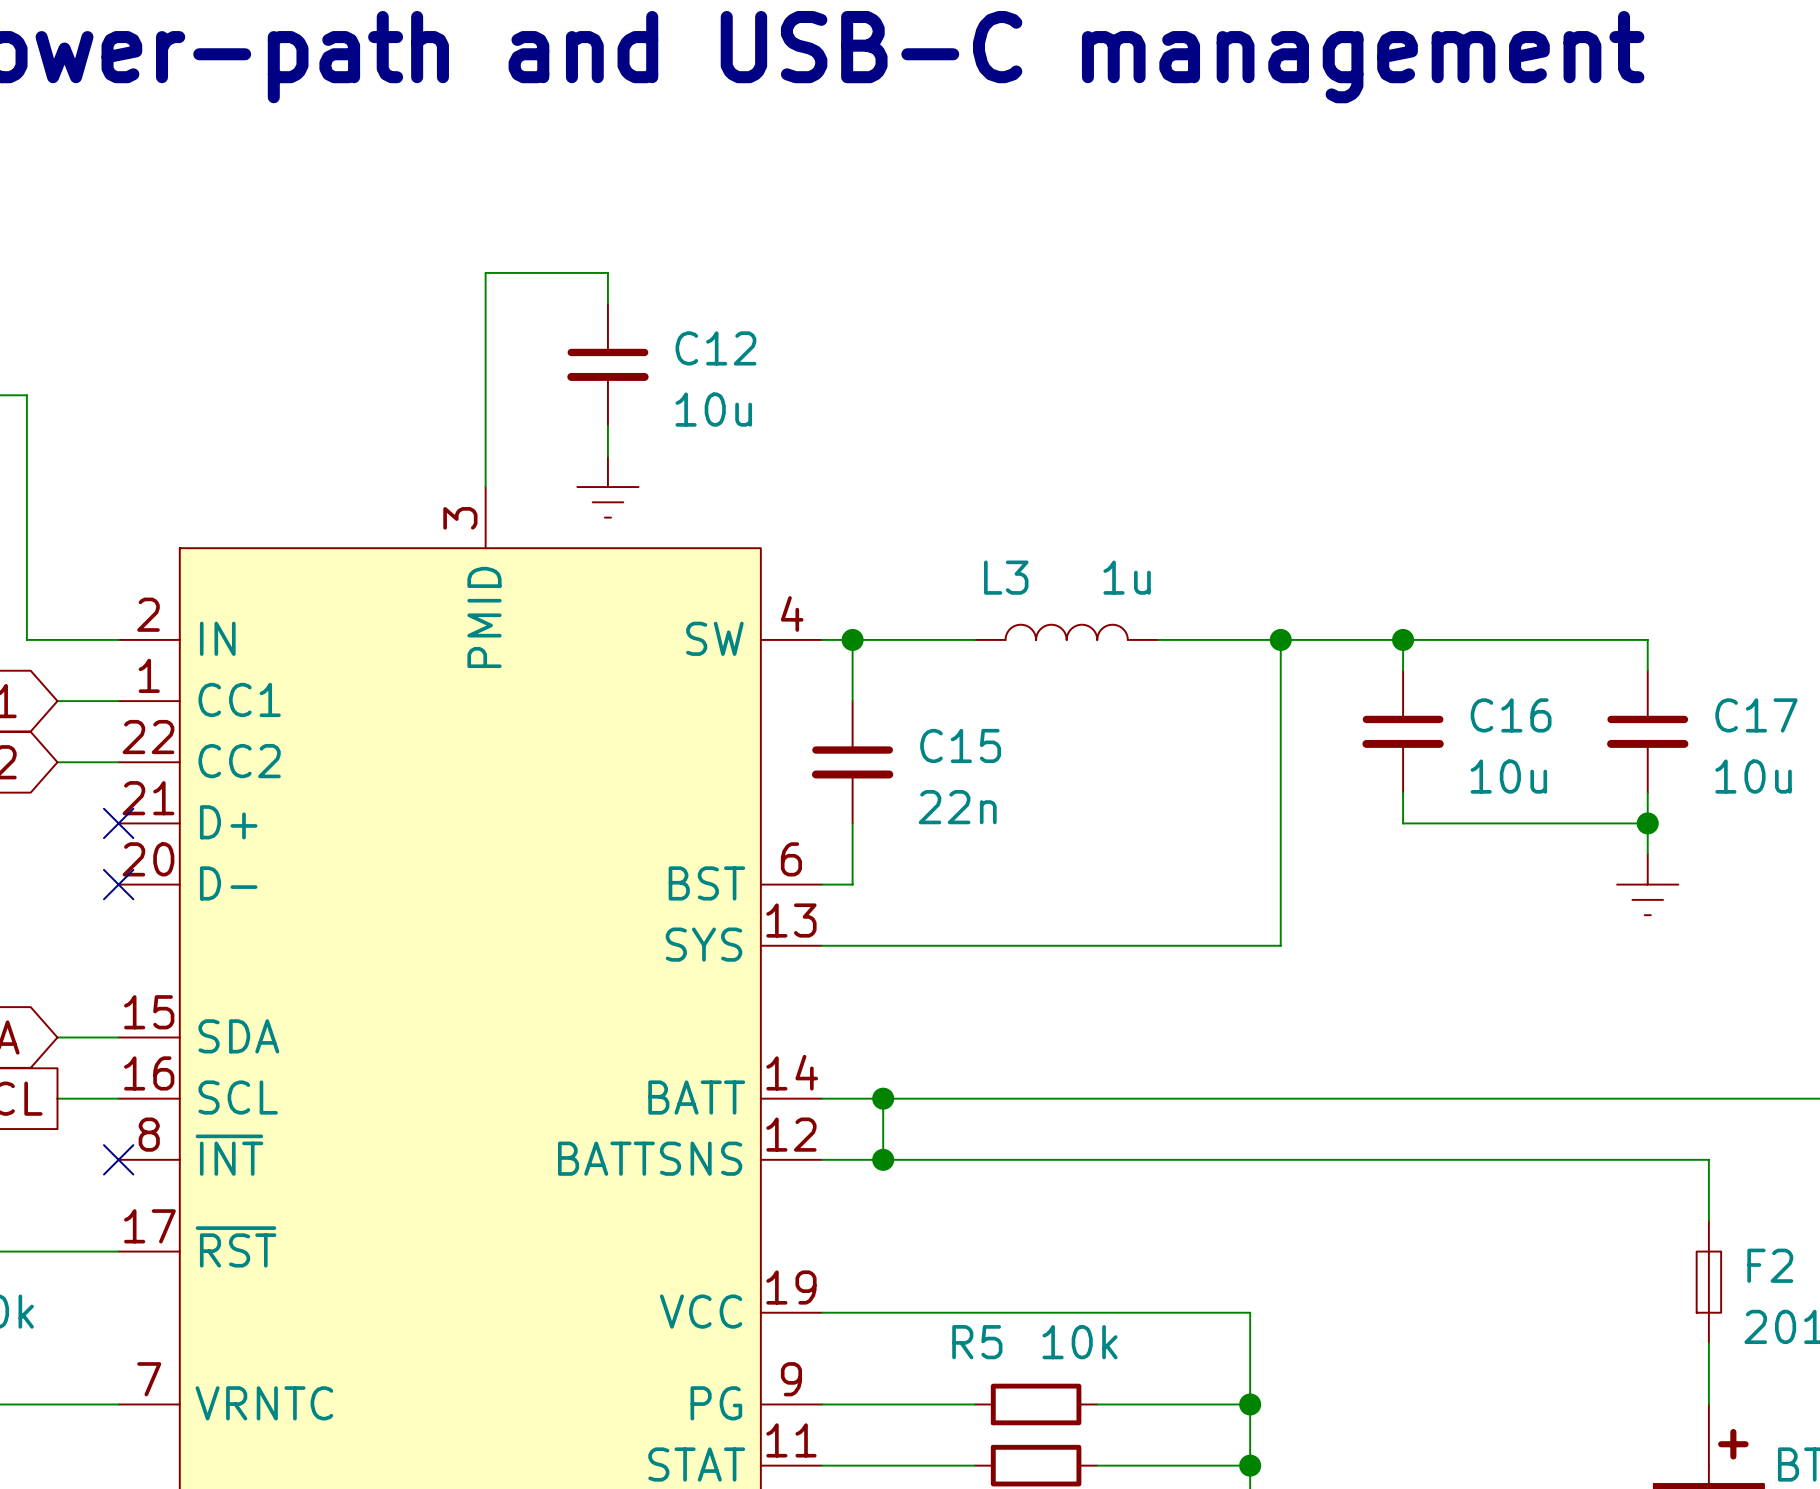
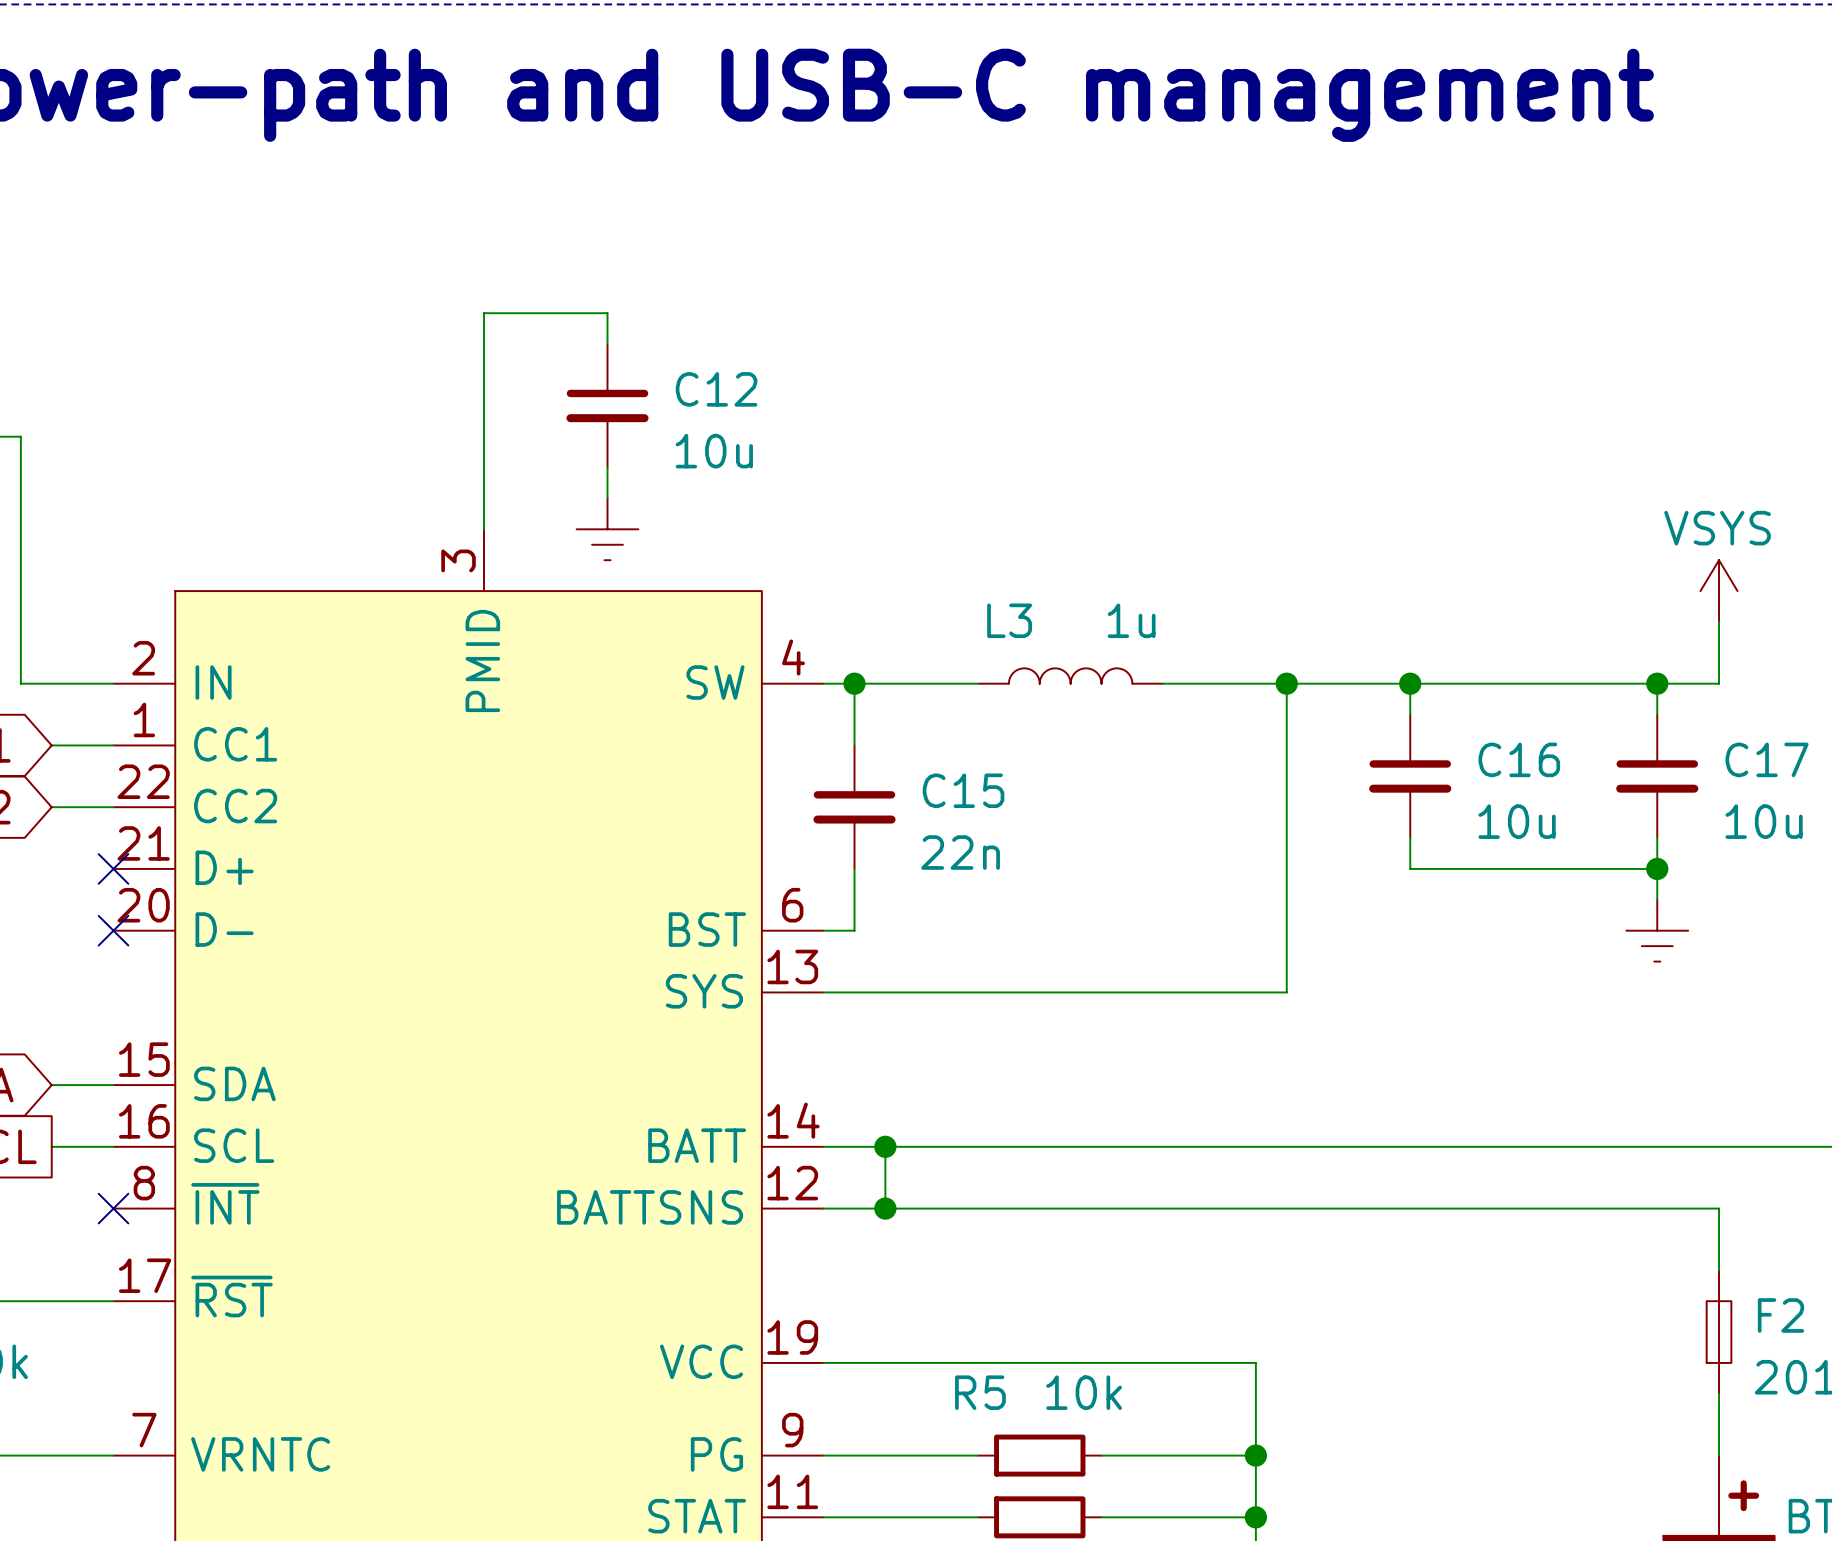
power symbol: none -> VSYS (1719, 591)
wire: none -> (1719, 621) (1719, 683) (1657, 683)
junction: none -> (1657, 683)

